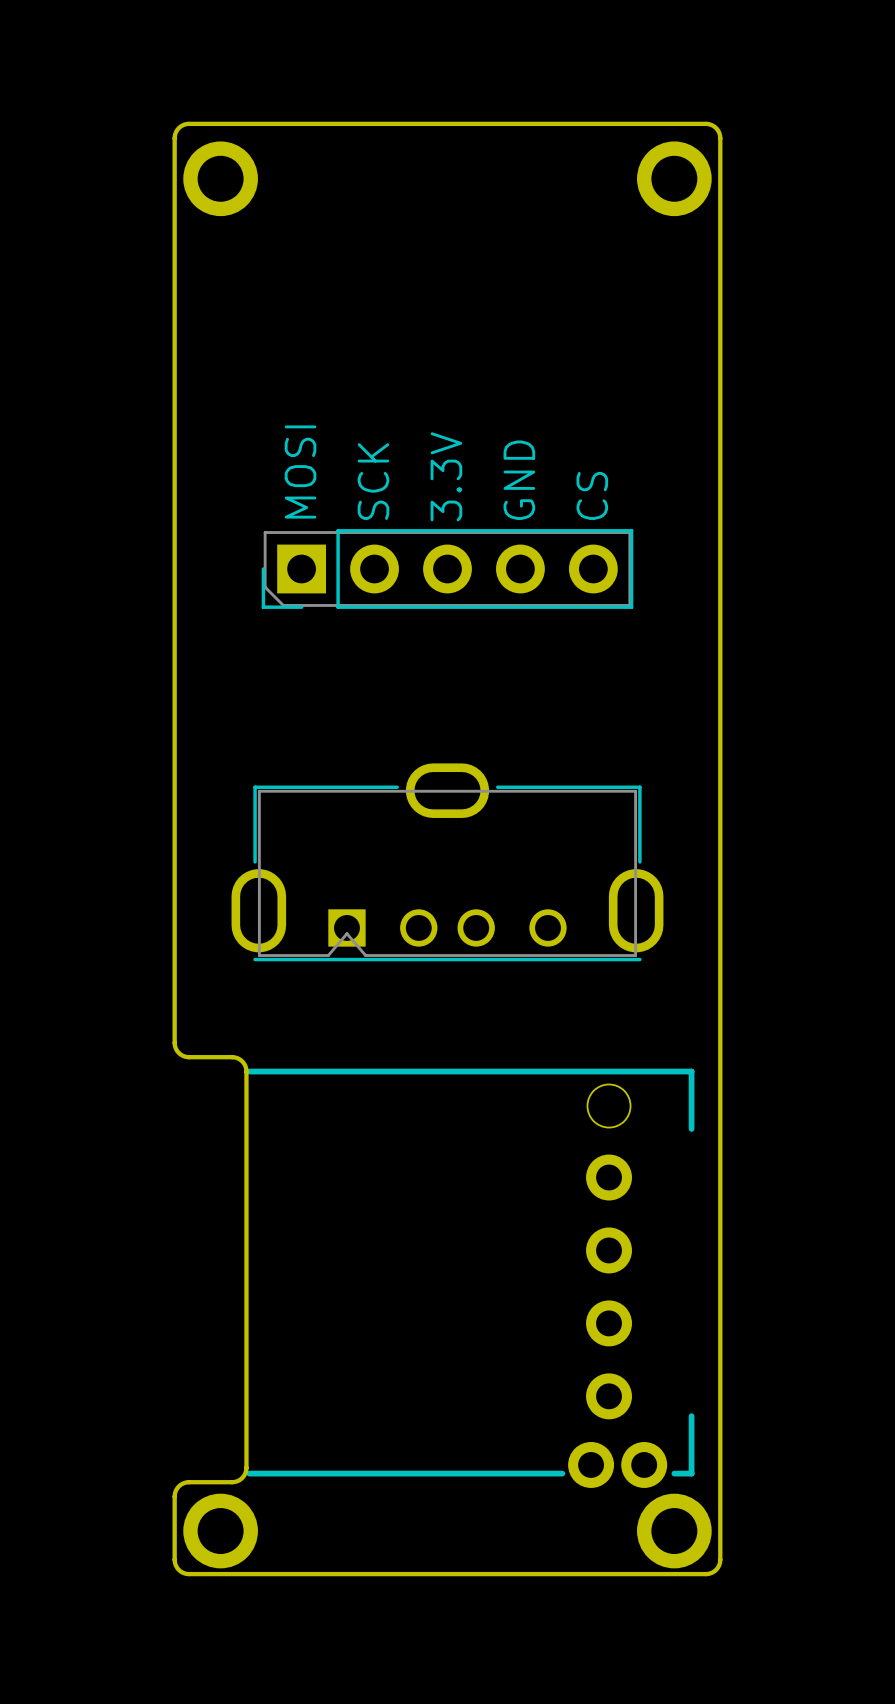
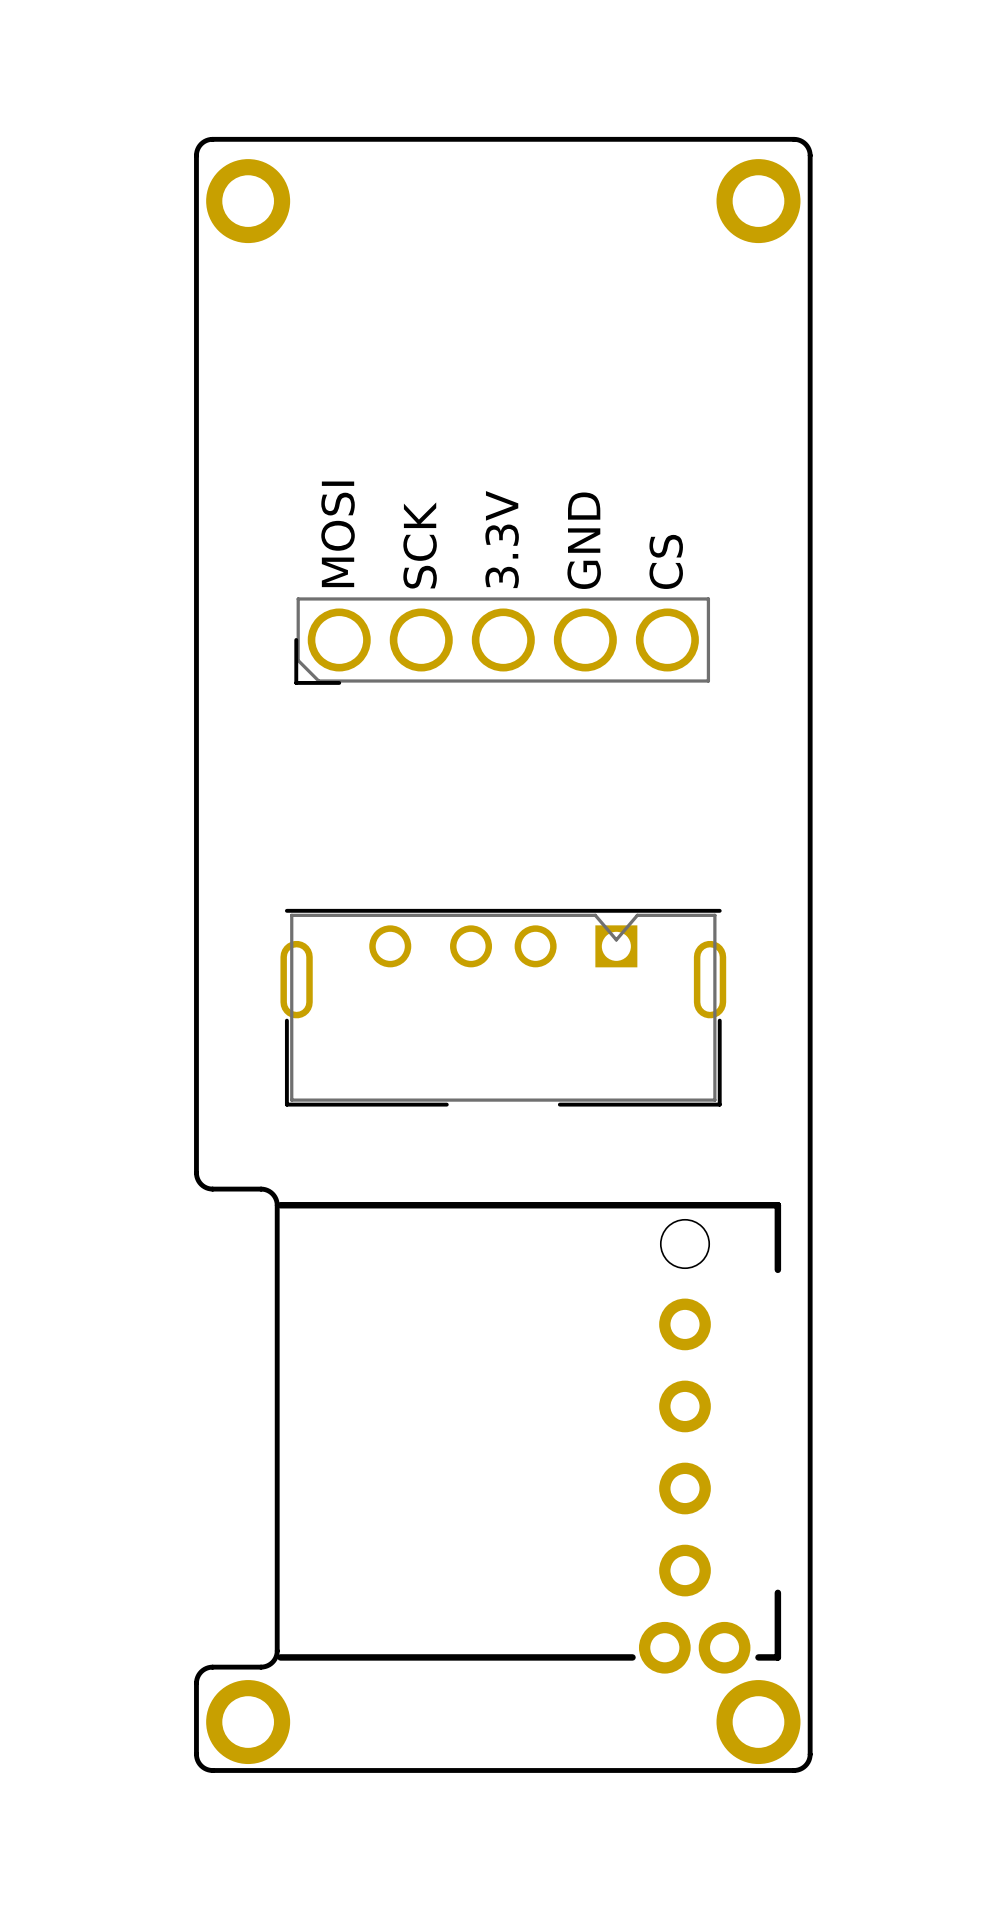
part footprint: [261, 529, 634, 609] -> [294, 597, 711, 685]
part: (447, 862) -> none
part: none -> (503, 1007)

